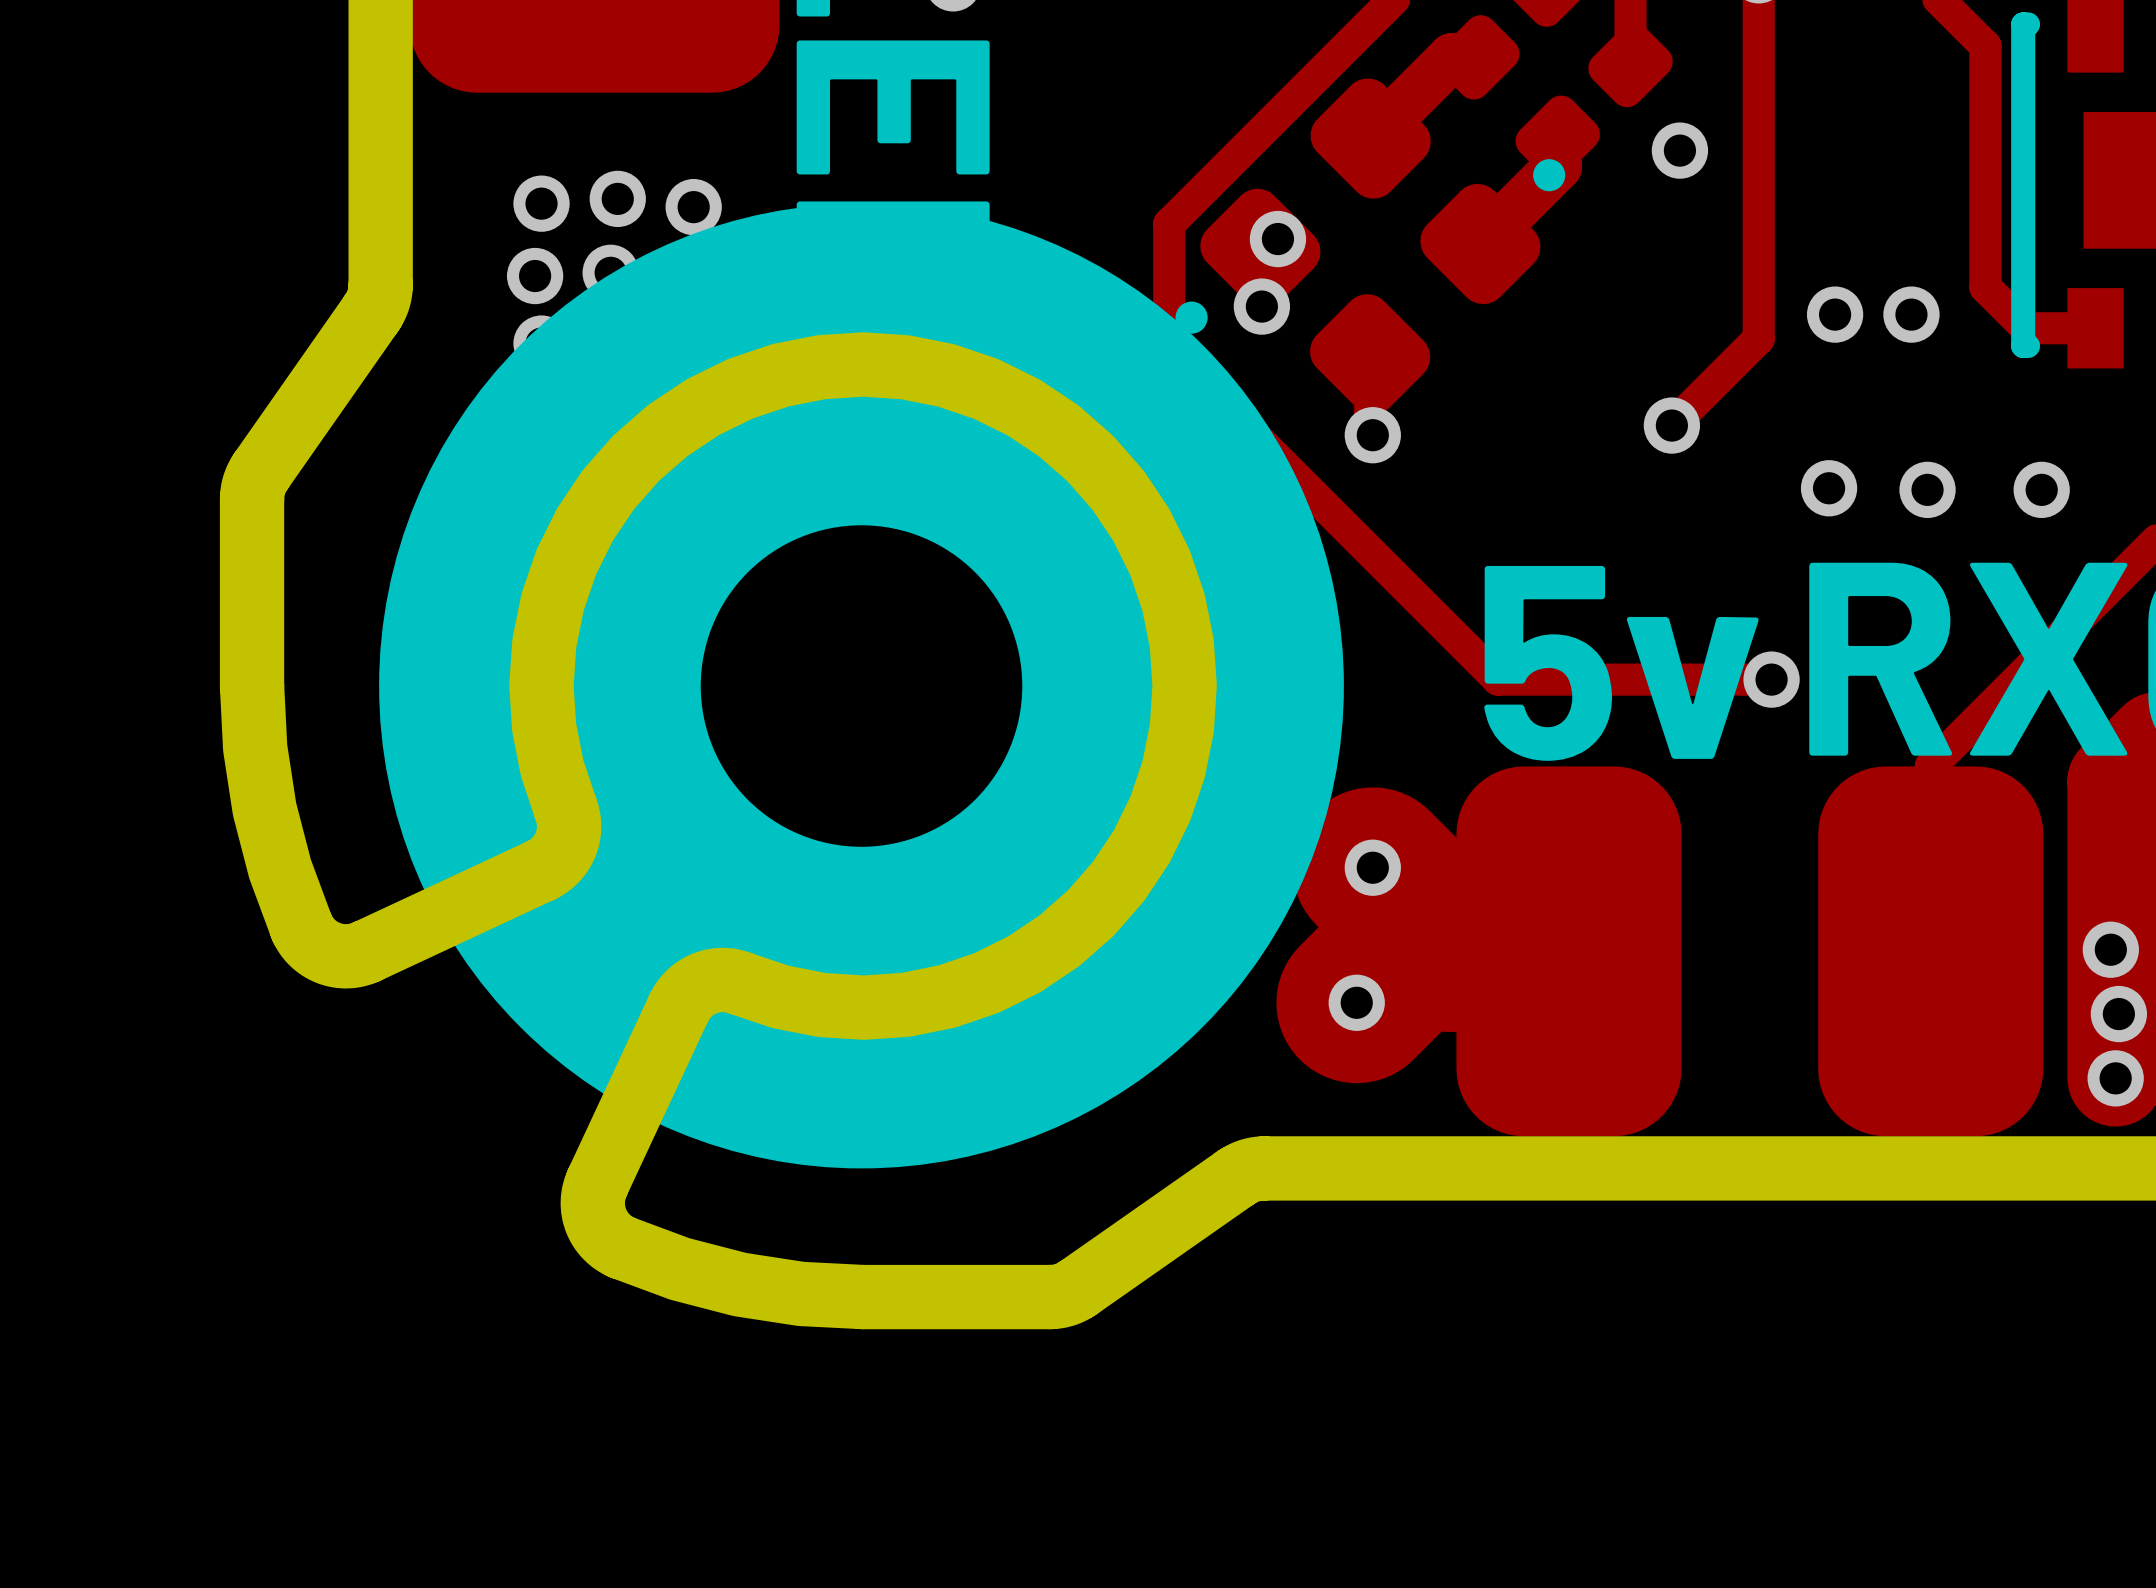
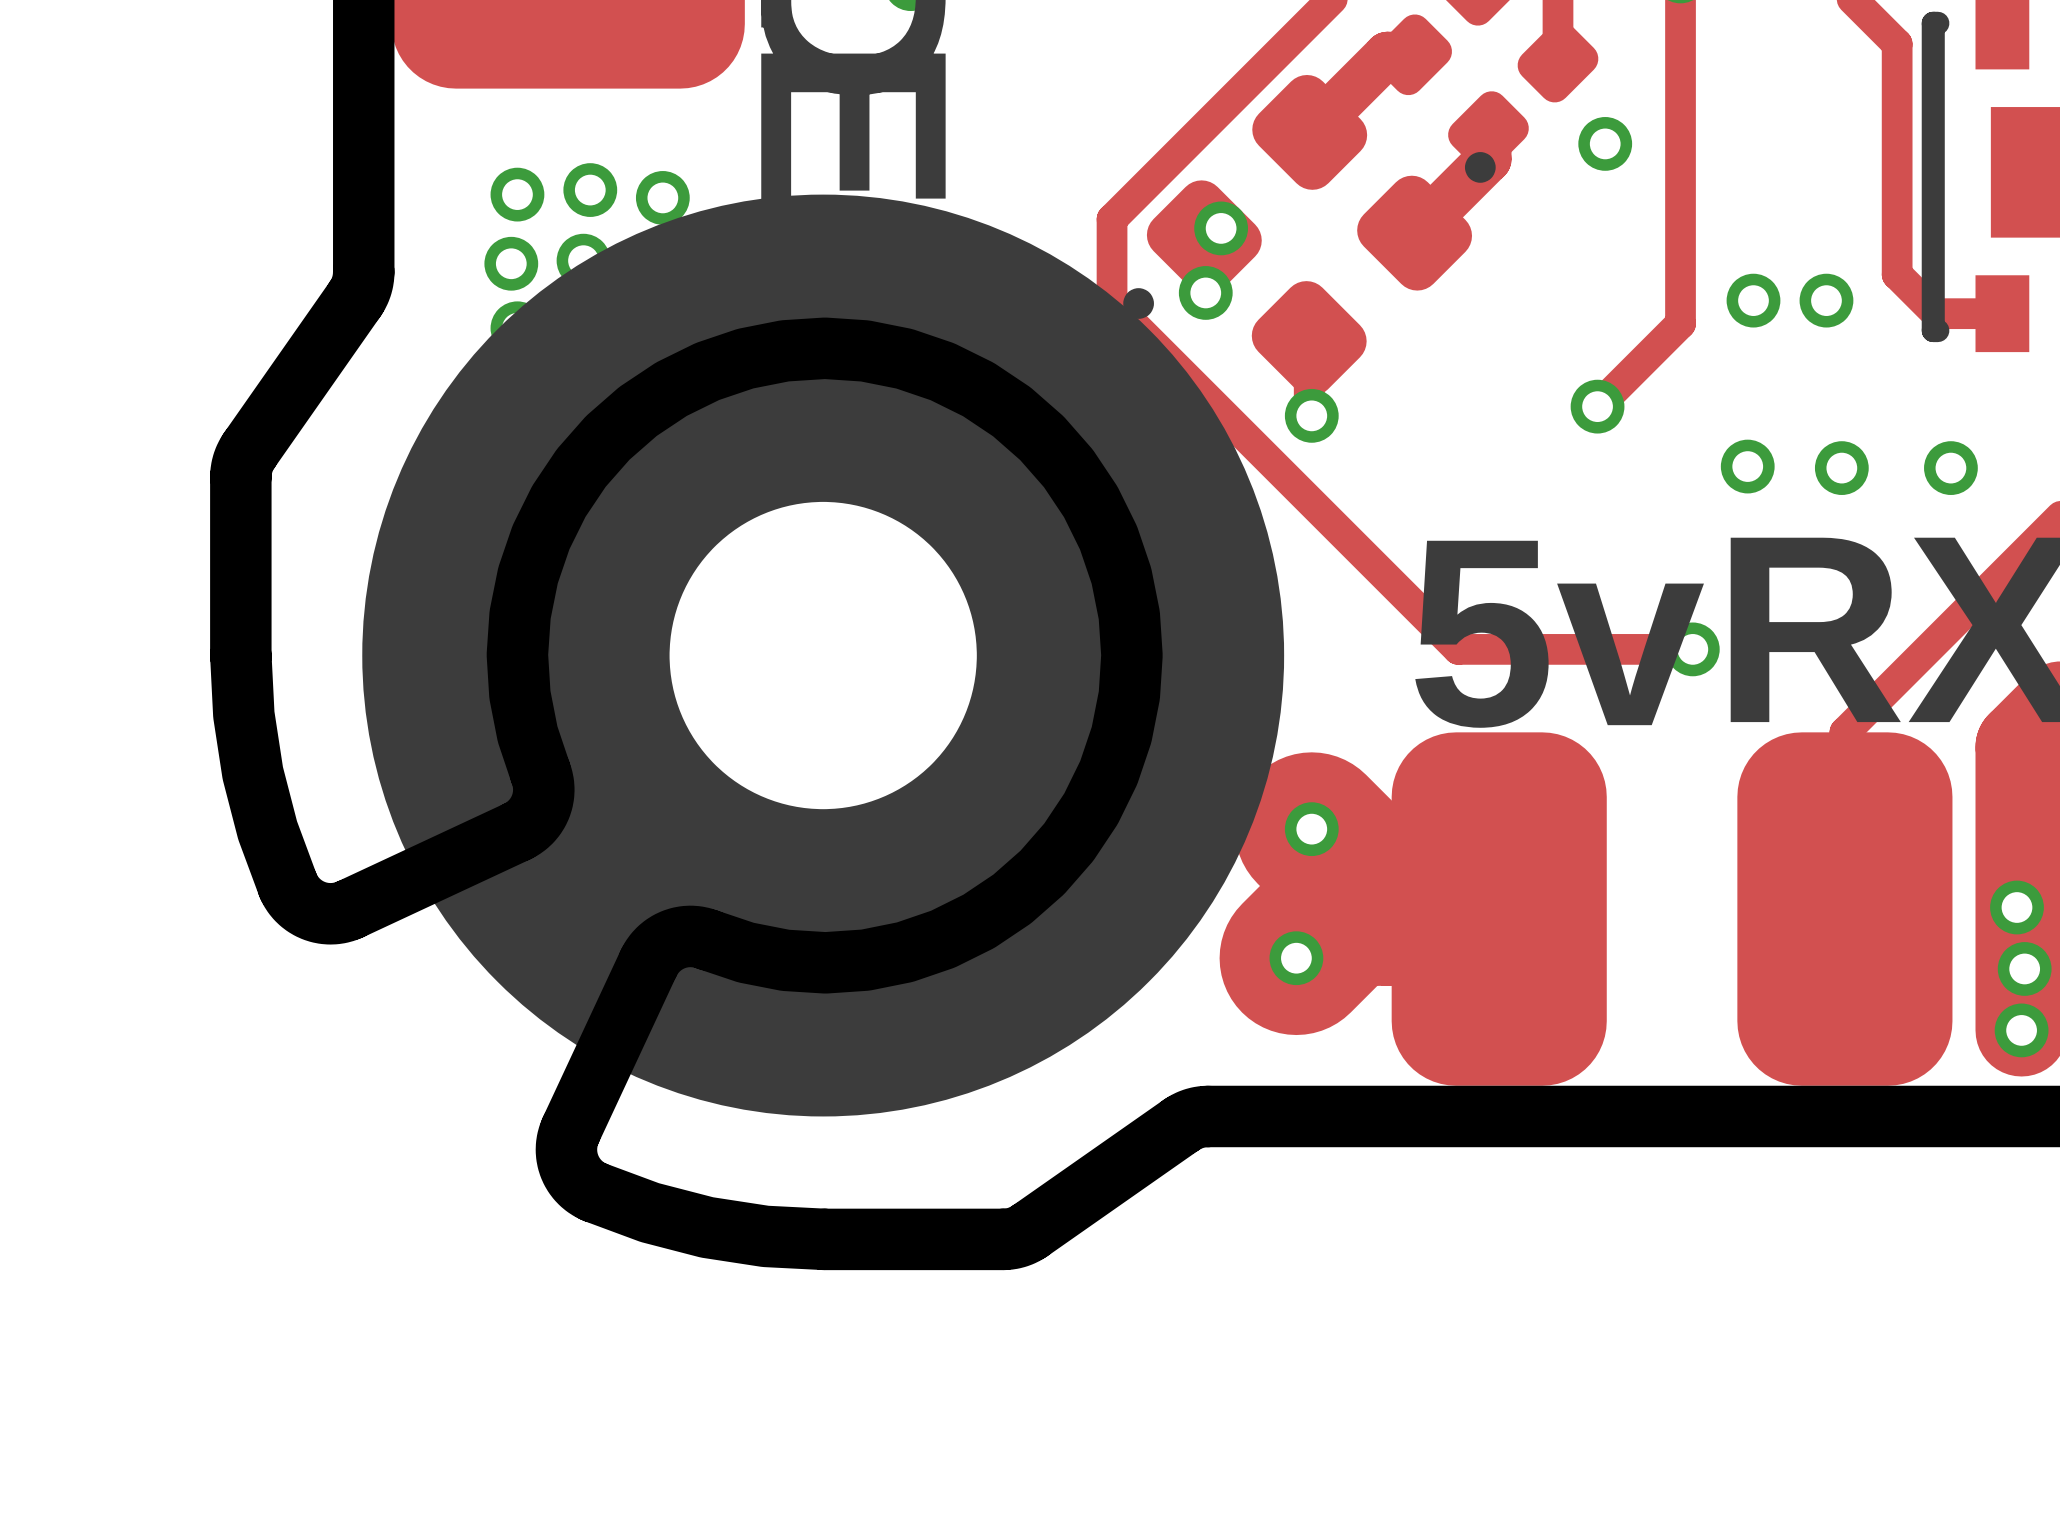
track: (1169, 224) (1169, 350) (1498, 679) (1526, 679) -> (1117, 214) (1112, 219) (1112, 303) (1458, 649)

